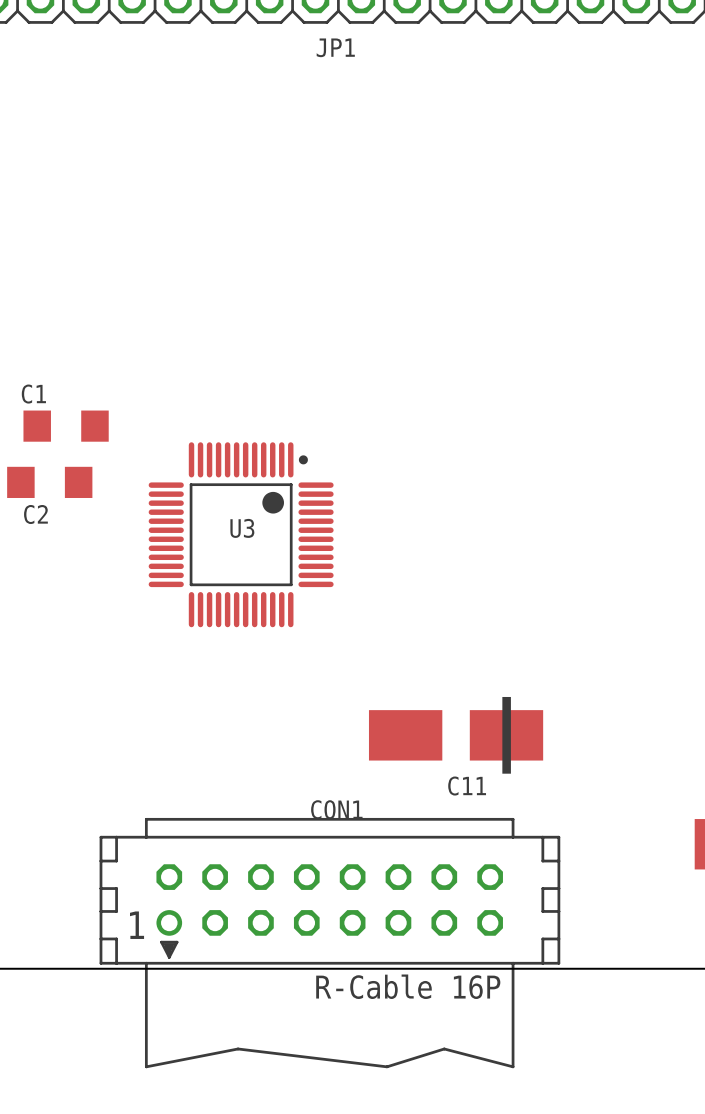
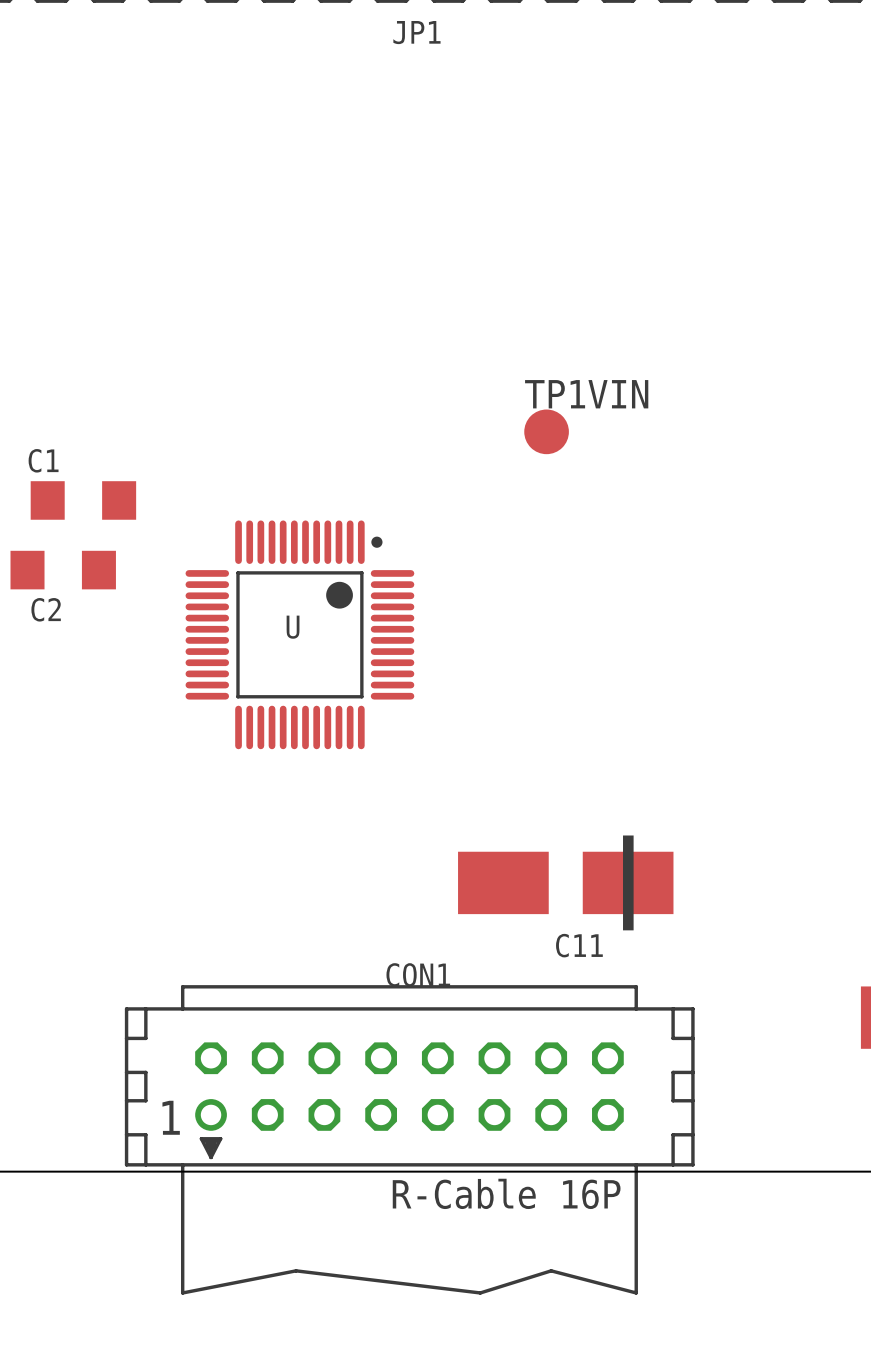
TP1VIN: none -> (546, 431)
U3 name: U3 (242, 528) -> U (293, 627)

